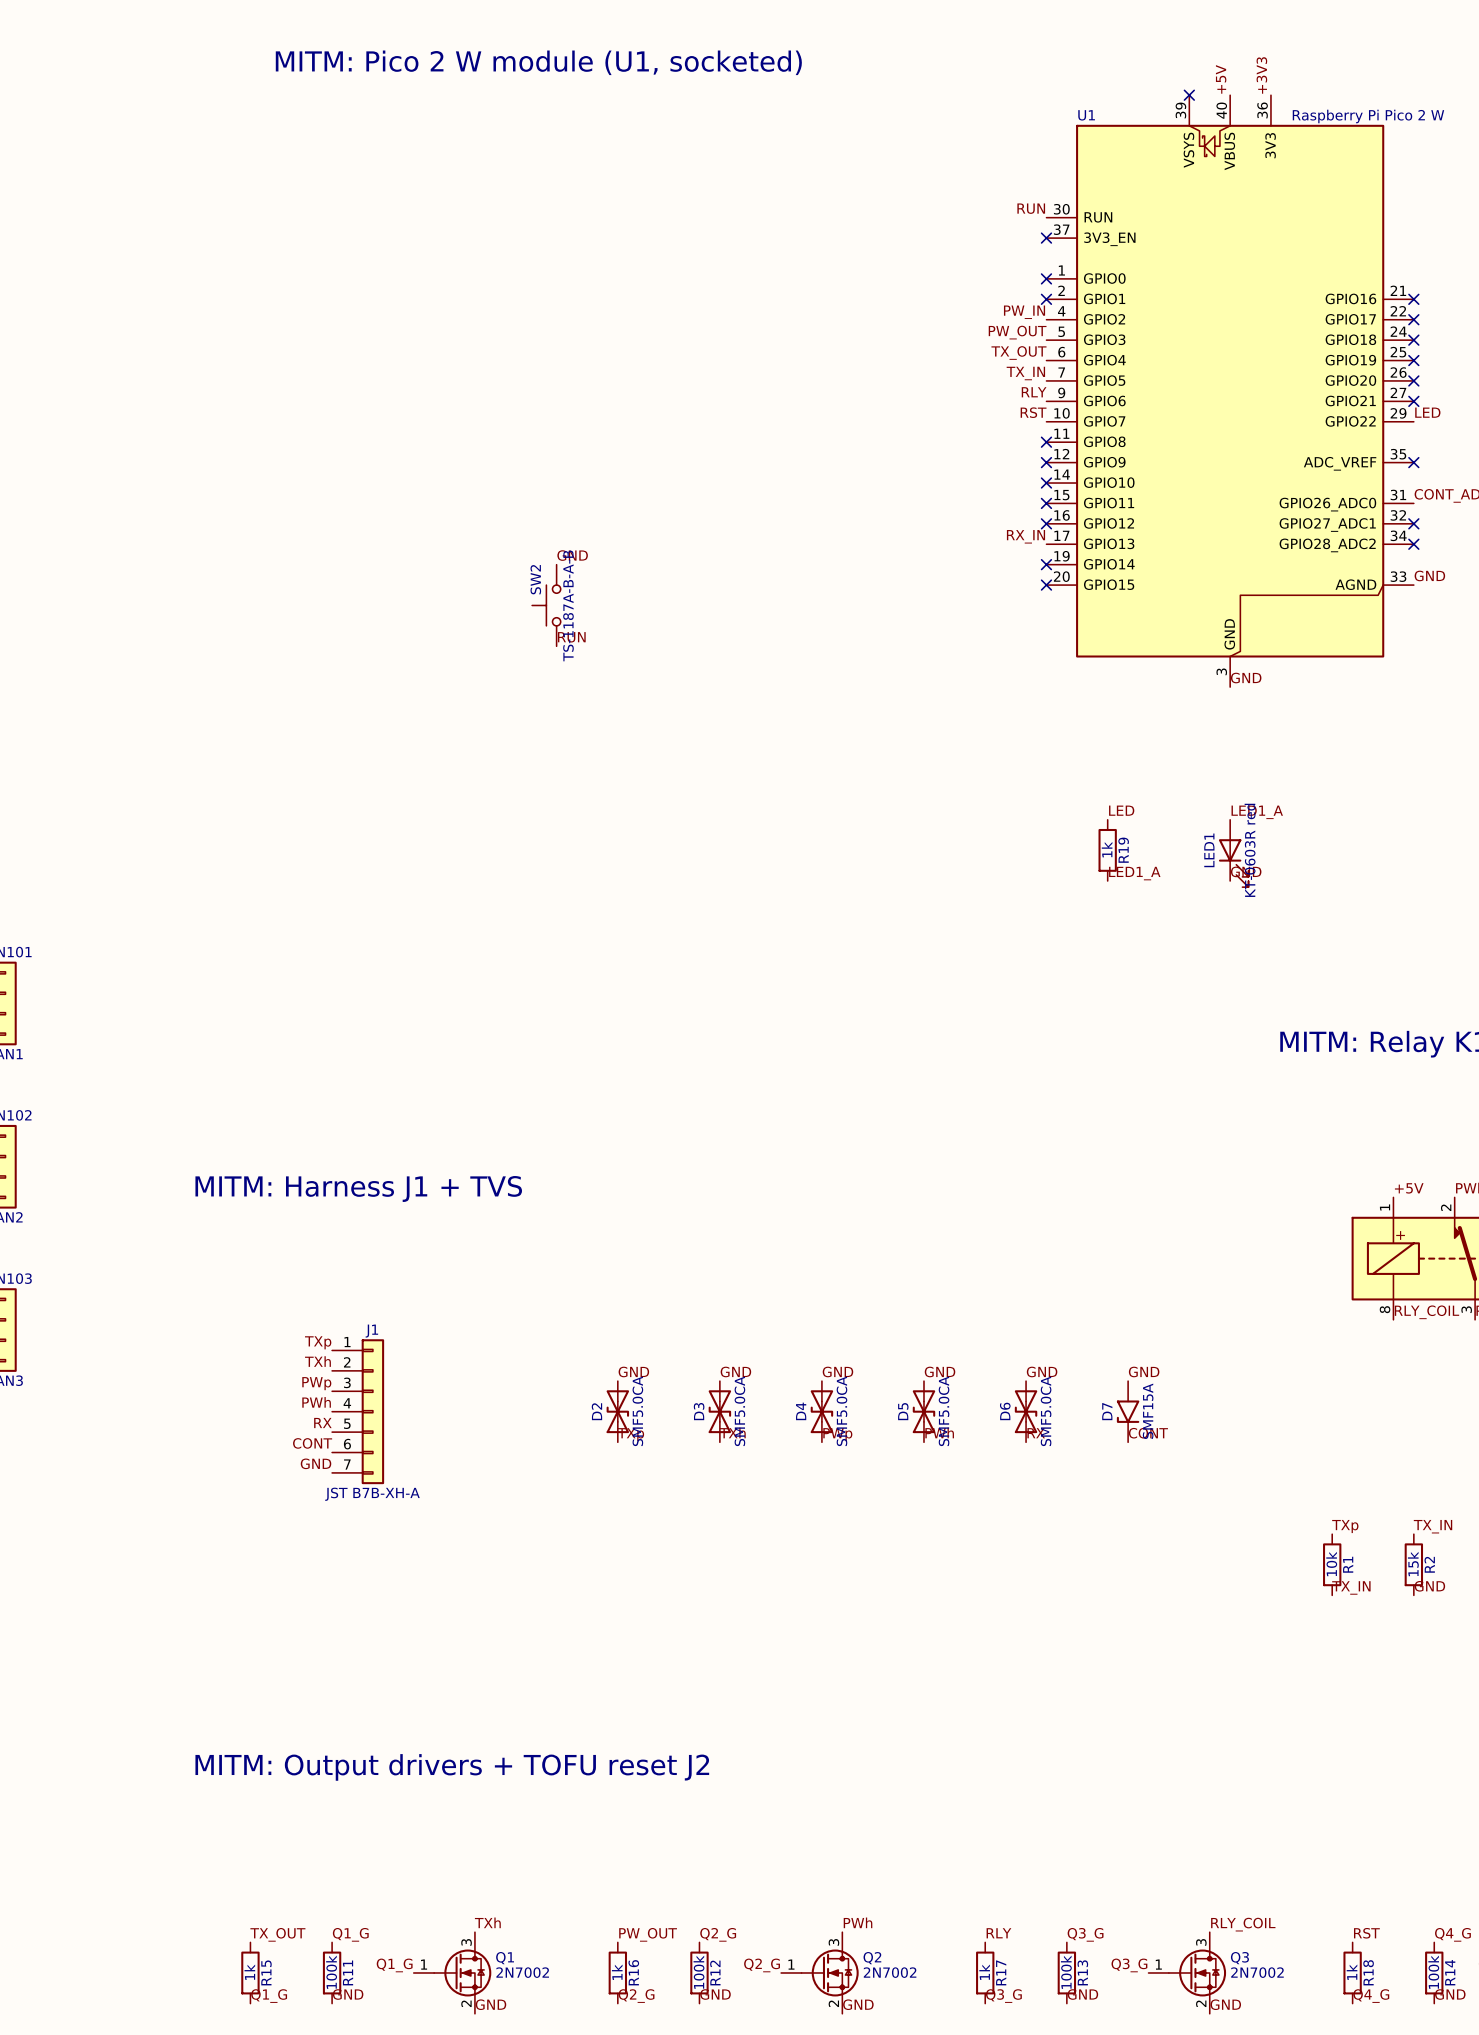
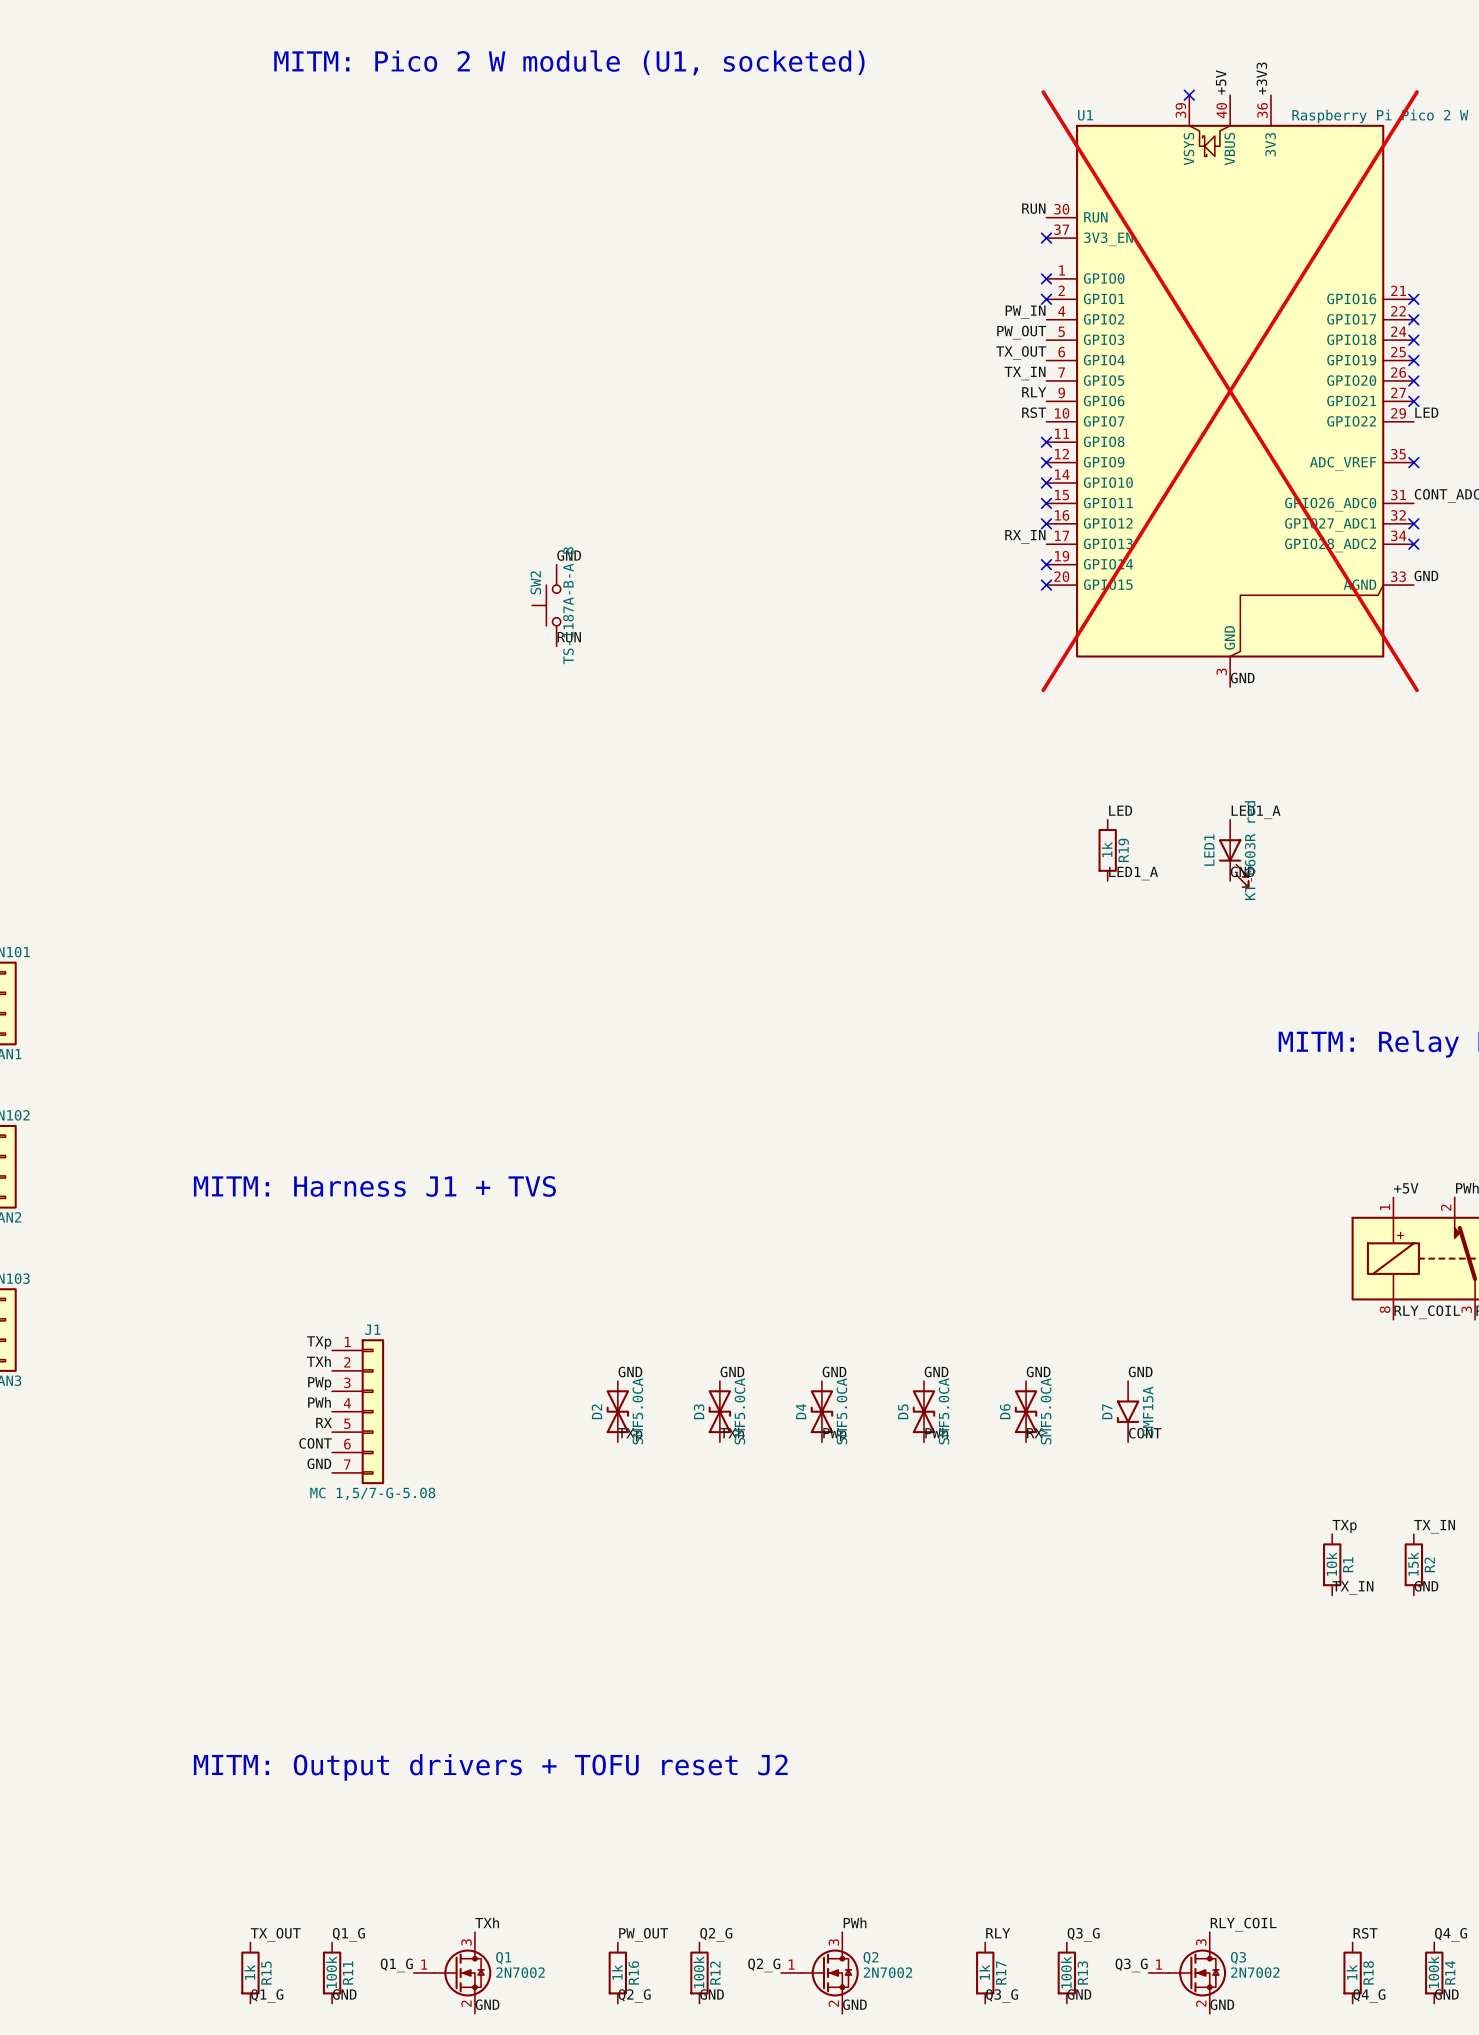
U1 do-not-place cross: none -> (1230, 391)
J1 value: JST B7B-XH-A (372, 1494) -> MC 1,5/7-G-5.08 (372, 1493)

